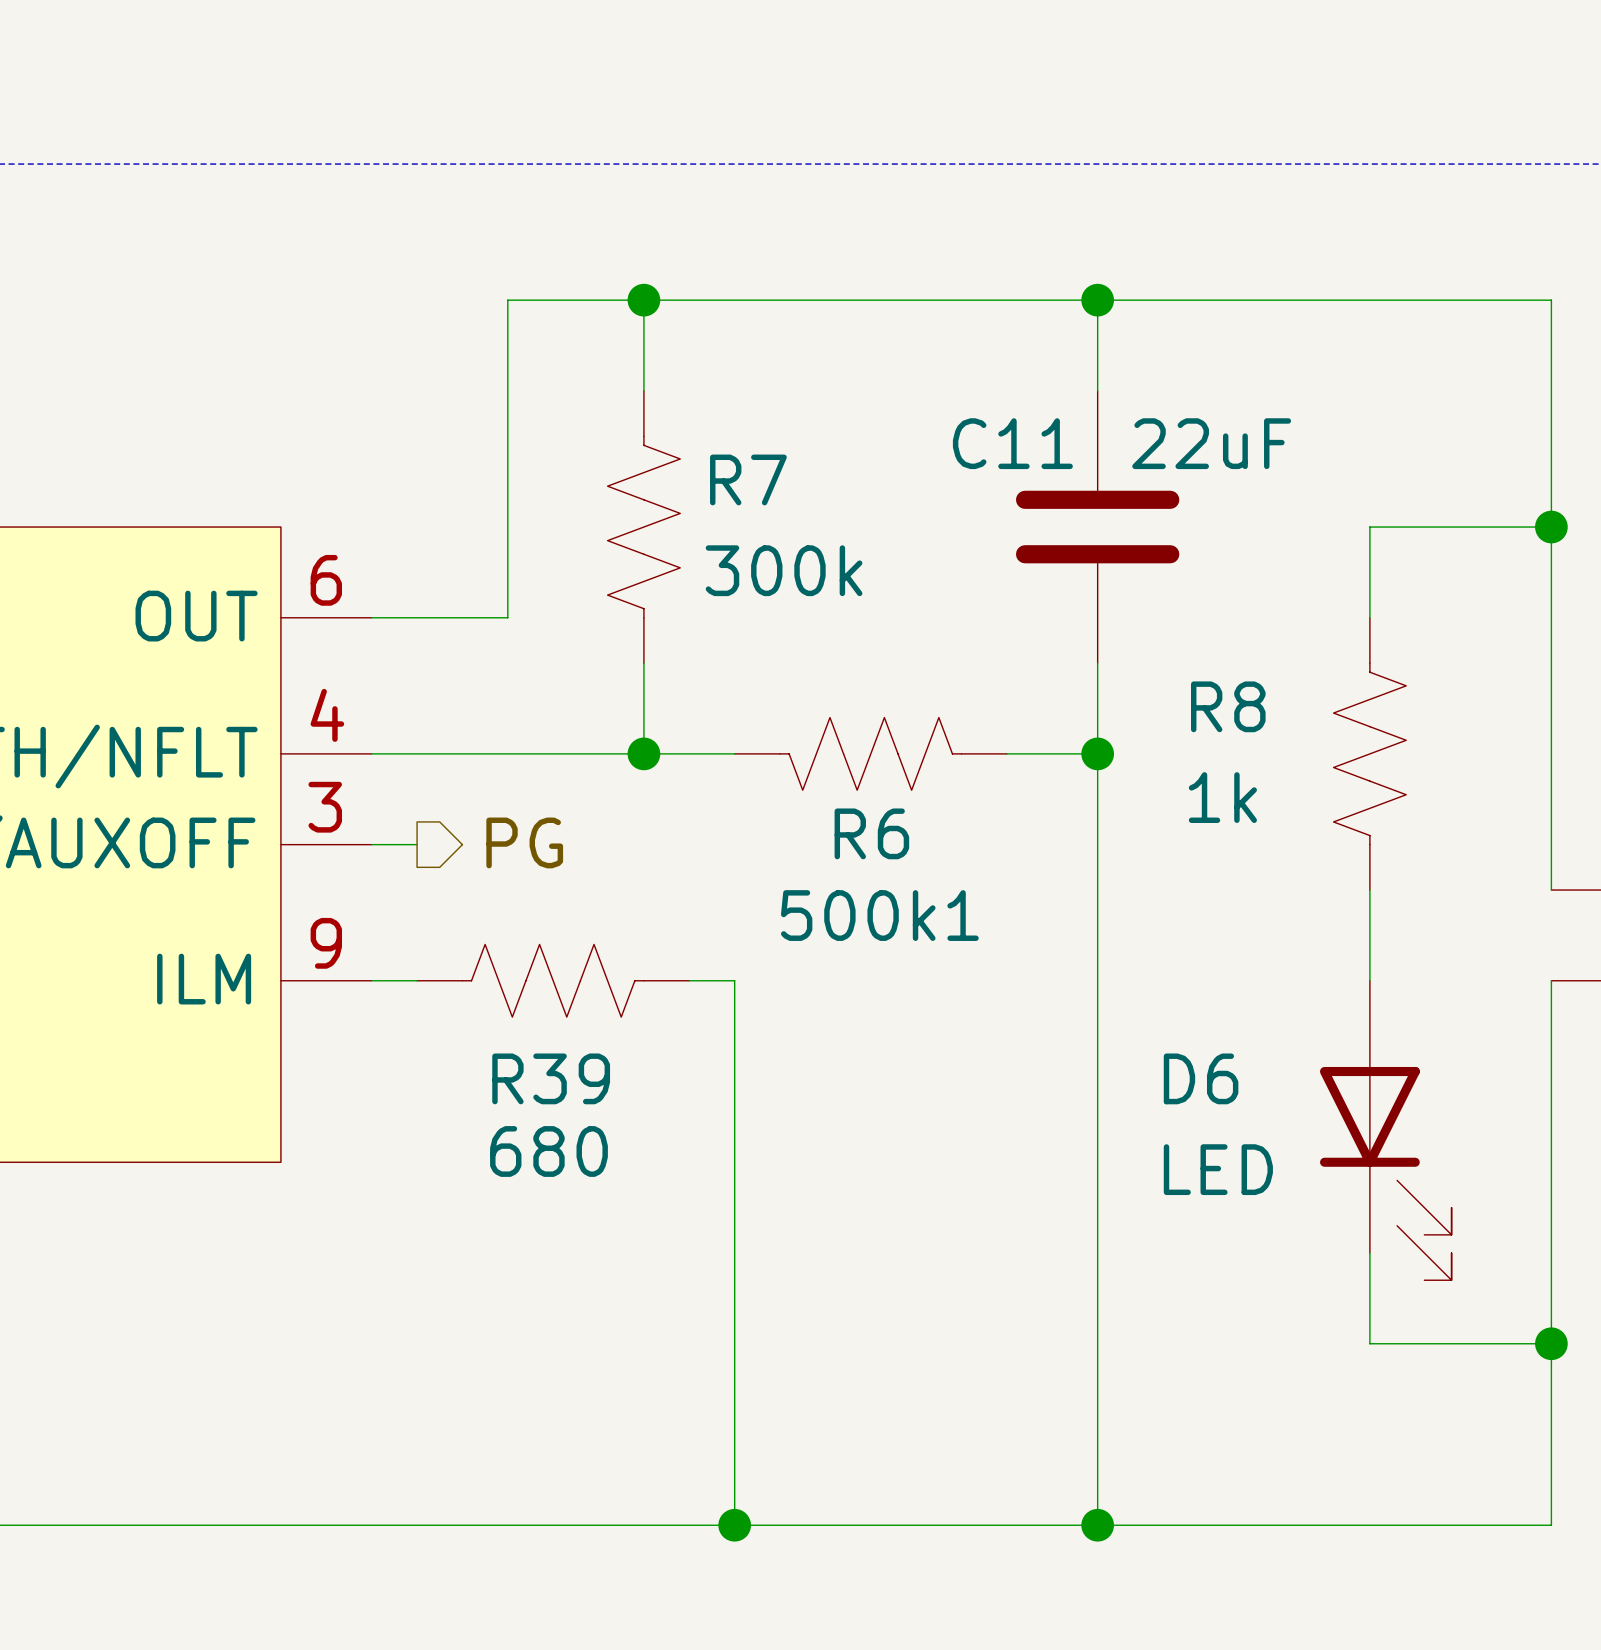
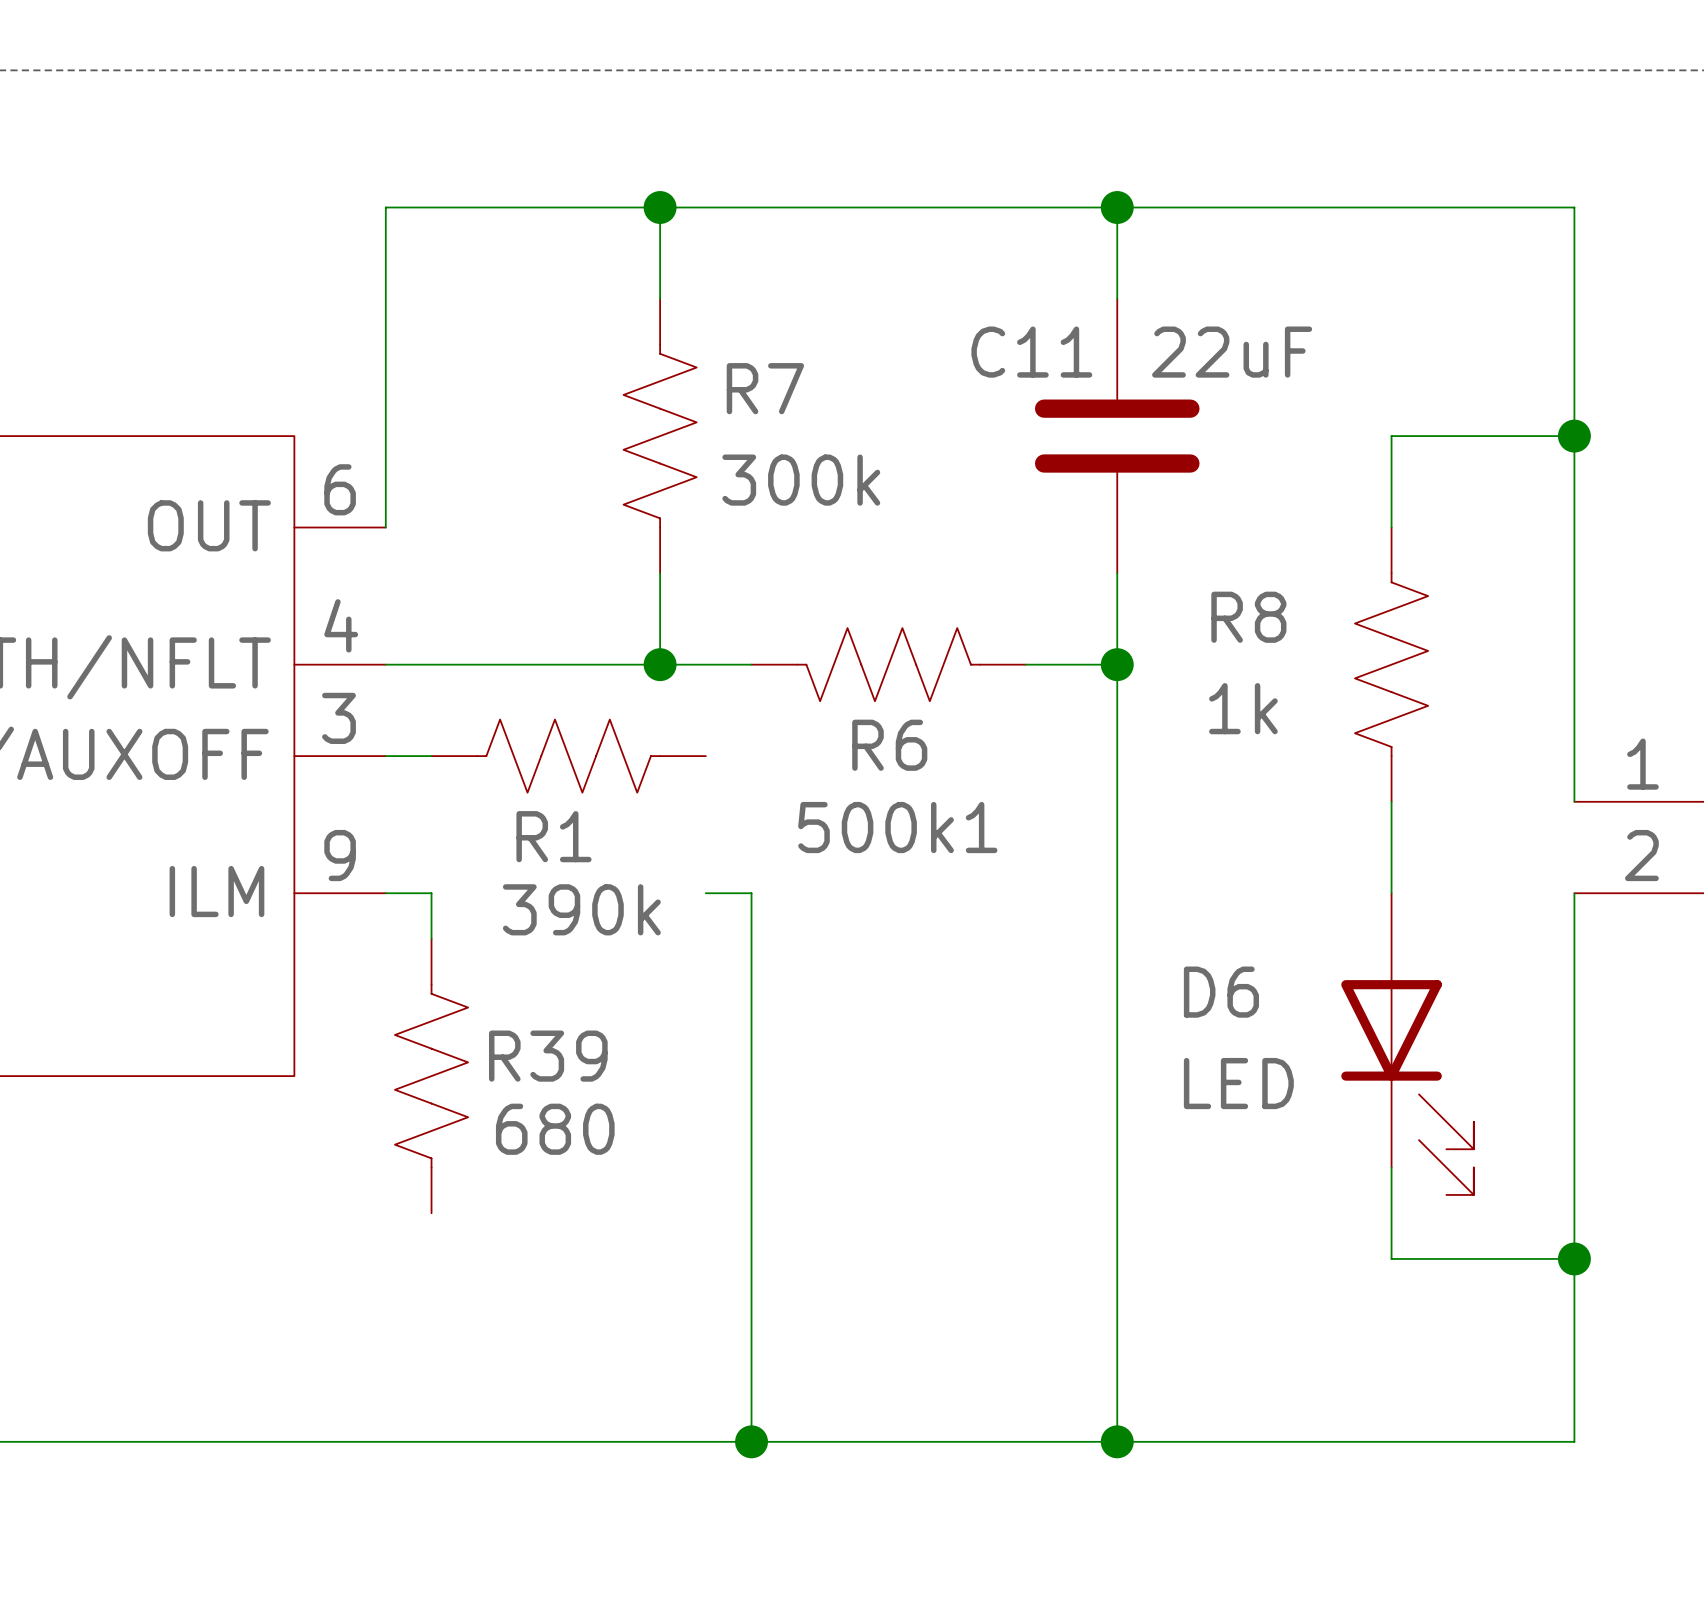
wire: (507, 300) (507, 617) (371, 617) -> (522, 207) (385, 207) (385, 527)
hierarchical label: PG (524, 842) -> none
R1: none -> 390k (568, 756)
wire: none -> (431, 893) (431, 938)
R39 rotation: 0° (553, 980) -> 90° clockwise (431, 1076)
R39 position: (553, 980) -> (431, 1076)
R39 name position: R39 (551, 1078) -> R39 (548, 1056)
R39 value position: 680 (548, 1151) -> 680 (555, 1129)

